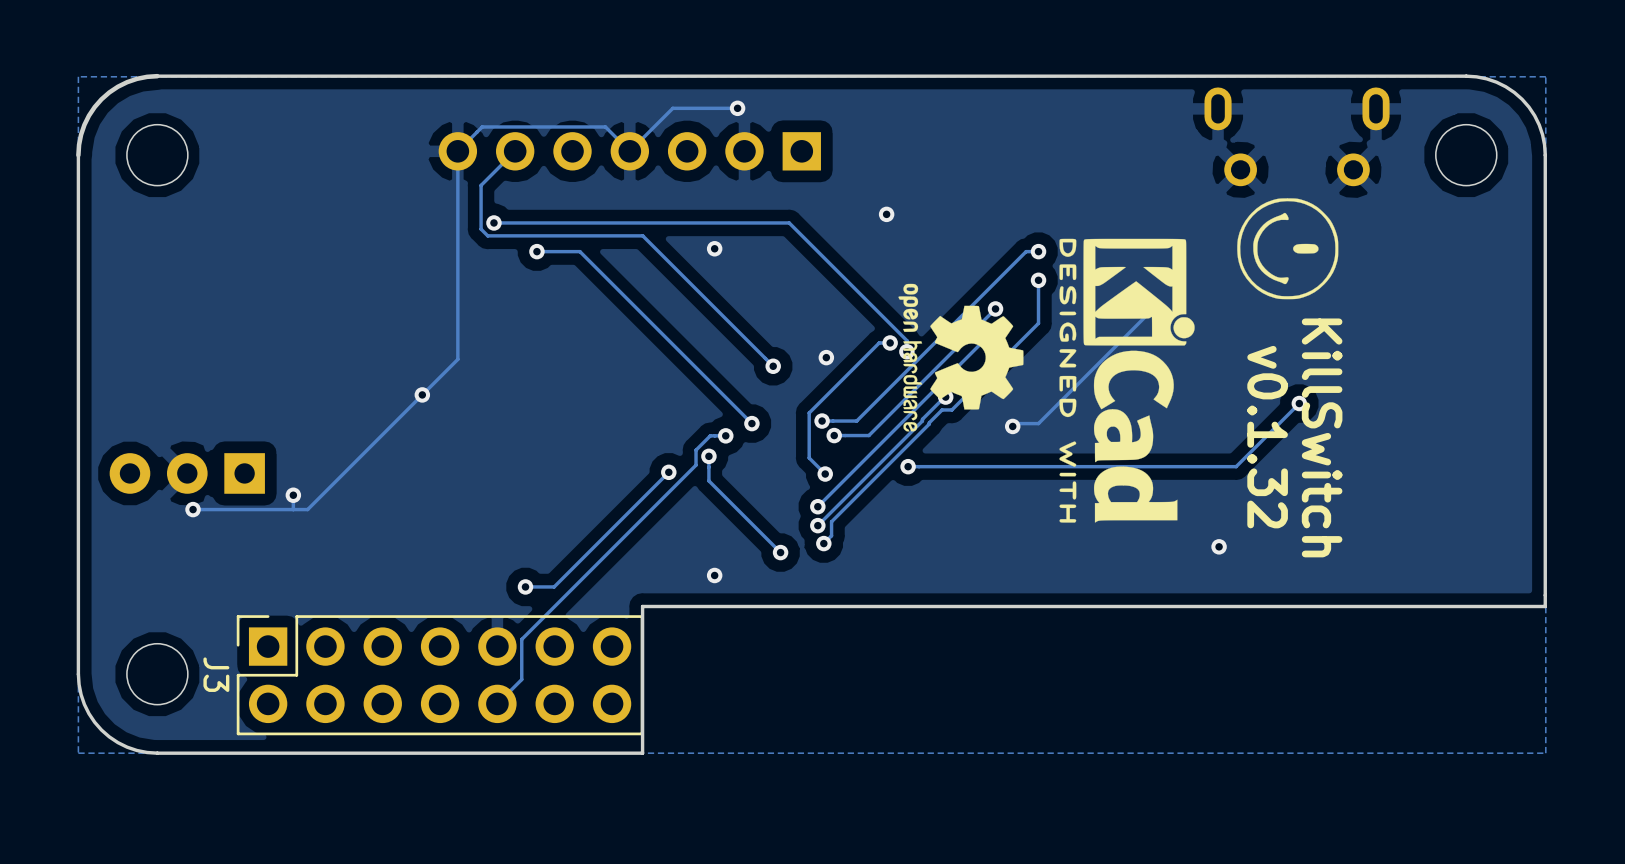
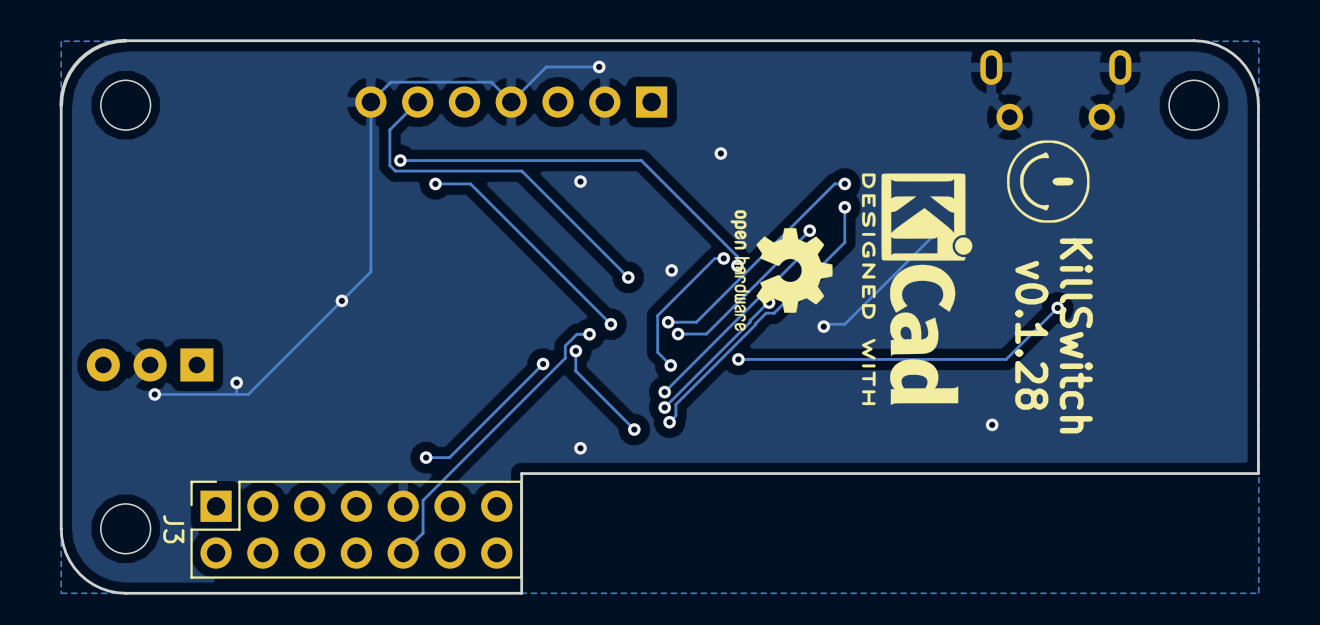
text: v0.1.32 (1267, 437) -> v0.1.28 (1031, 335)

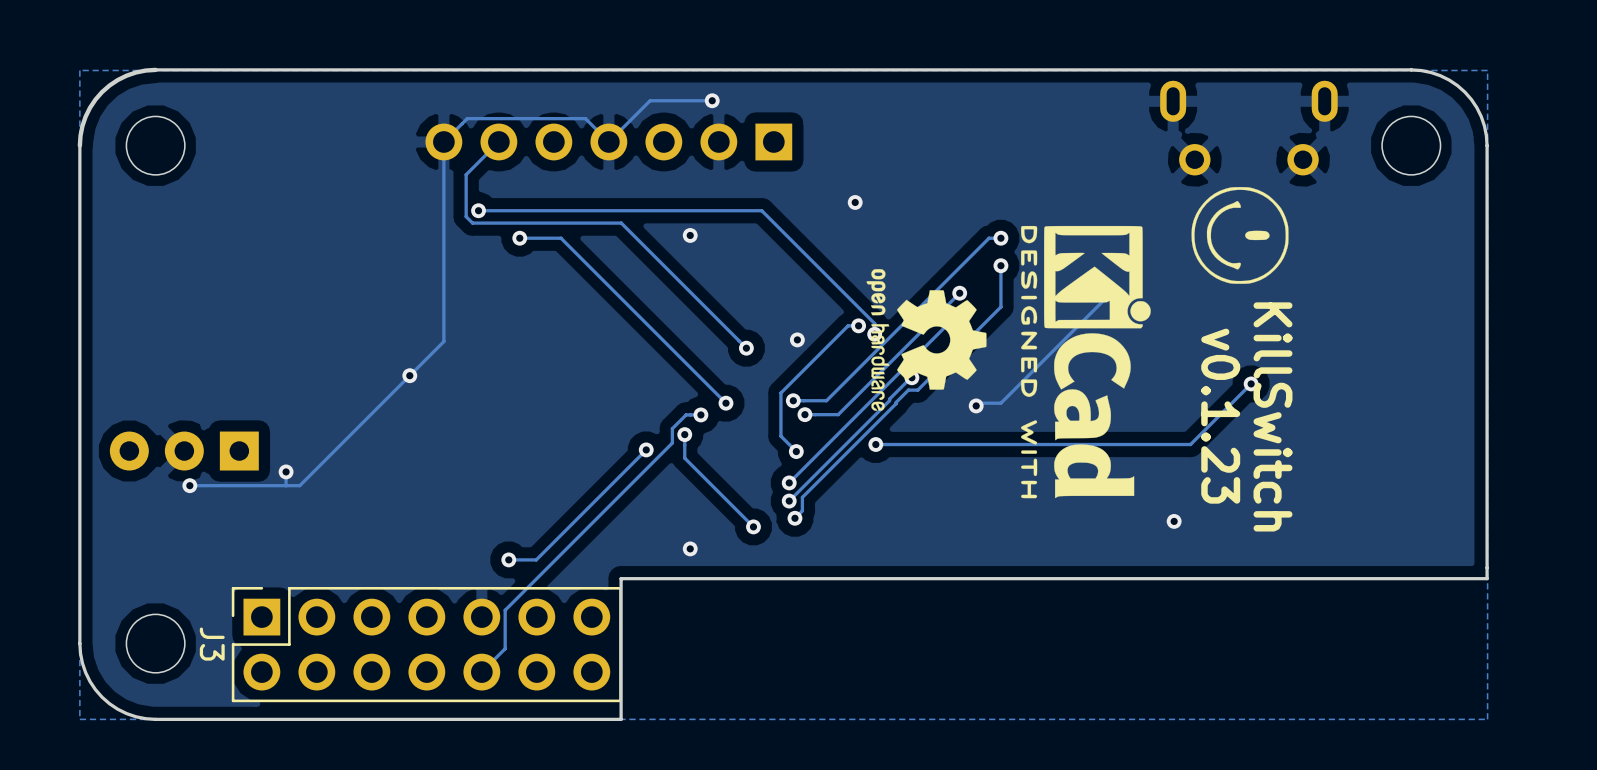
text: v0.1.28 (1031, 335) -> v0.1.23 (1220, 416)

